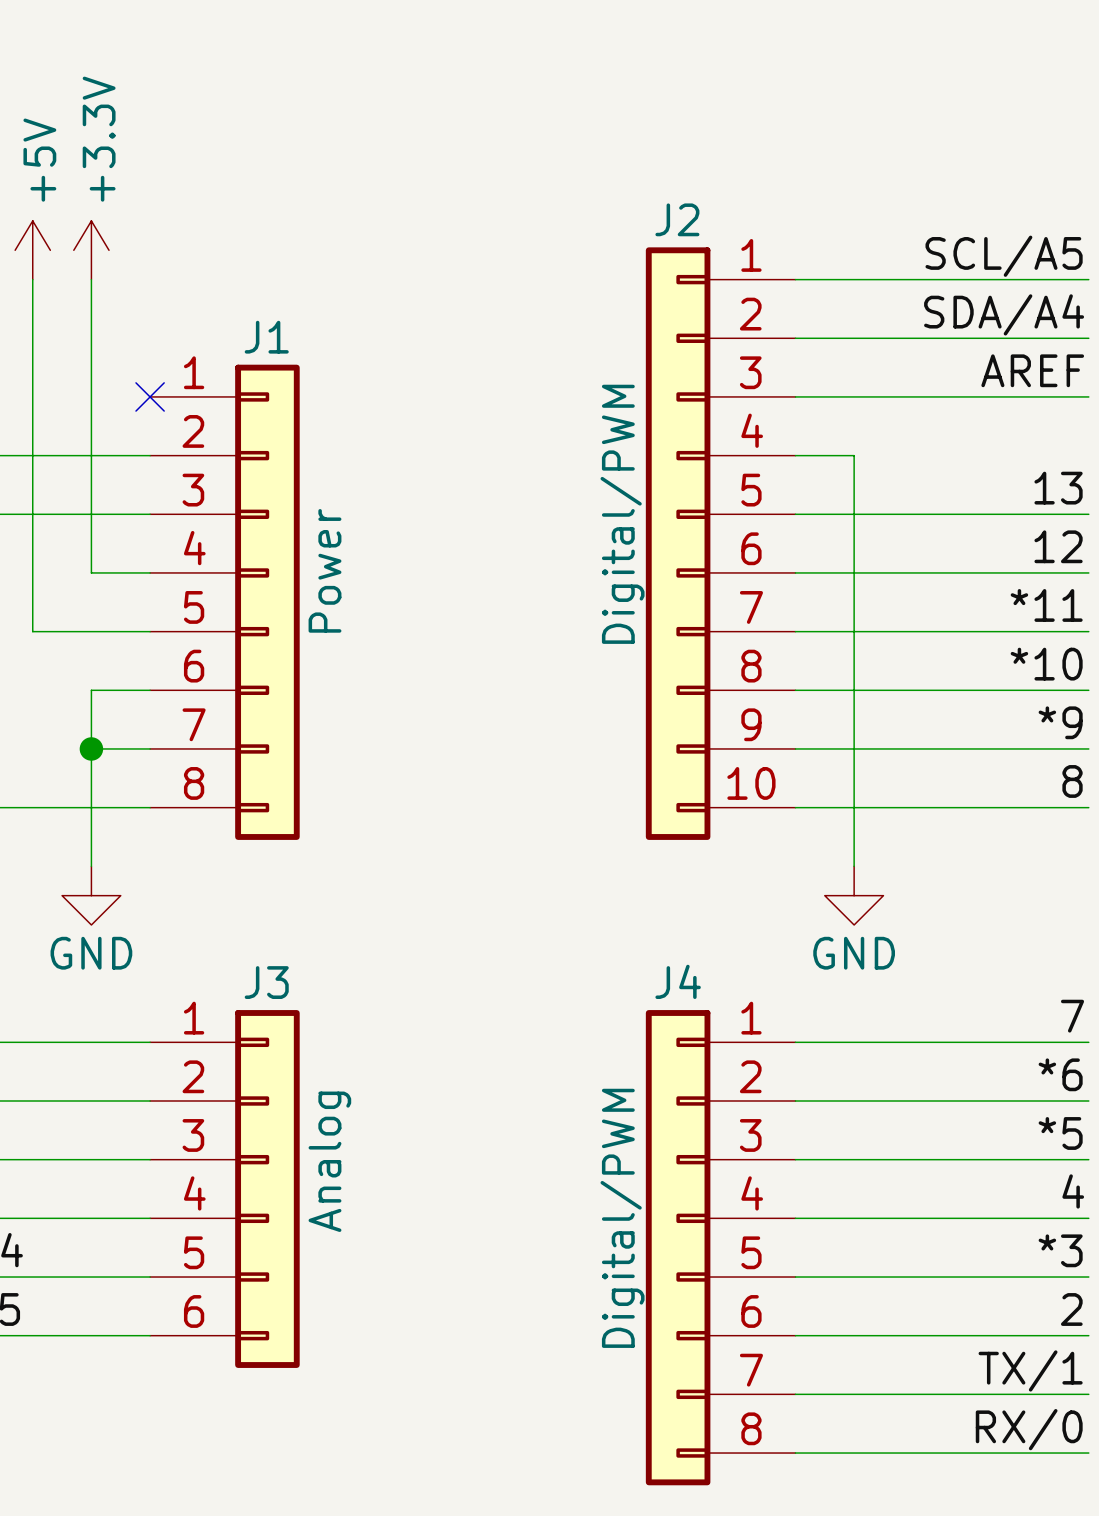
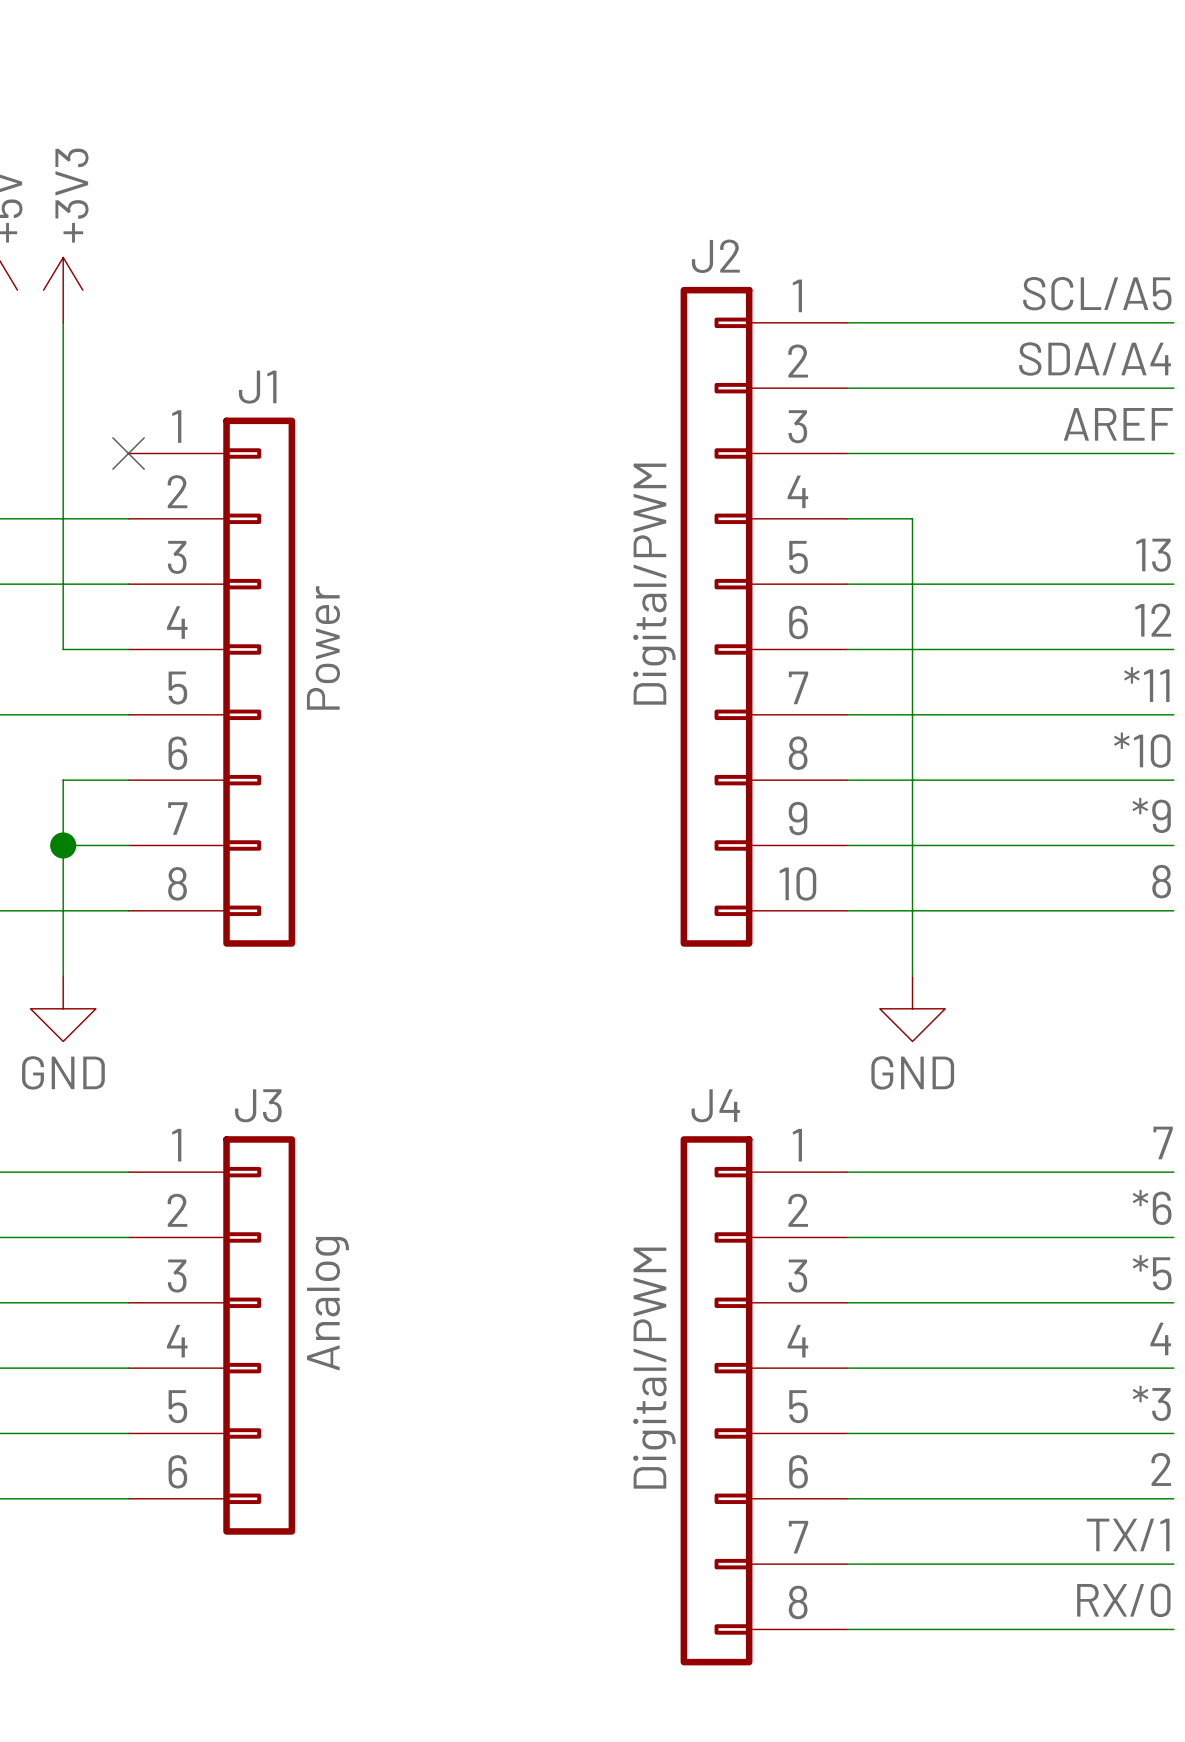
power symbol: +3.3V (91, 250) -> +3V3 (63, 290)

